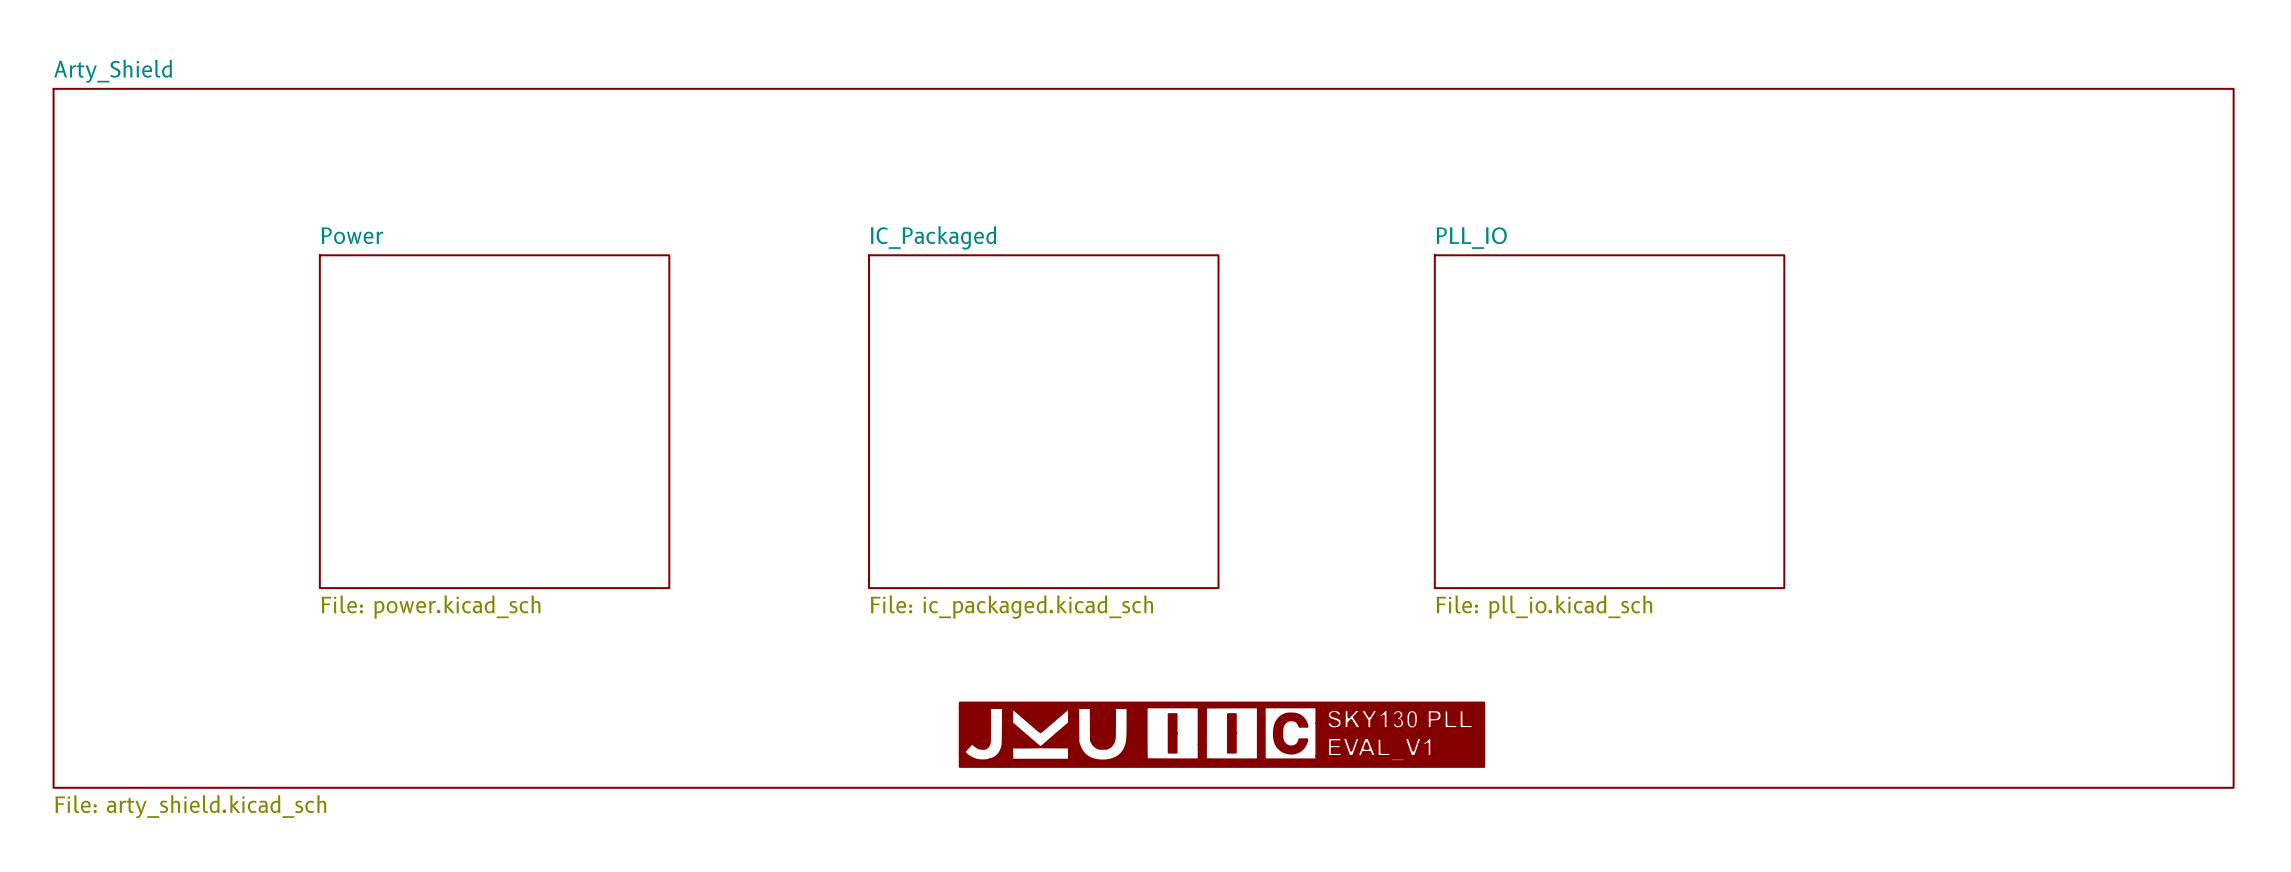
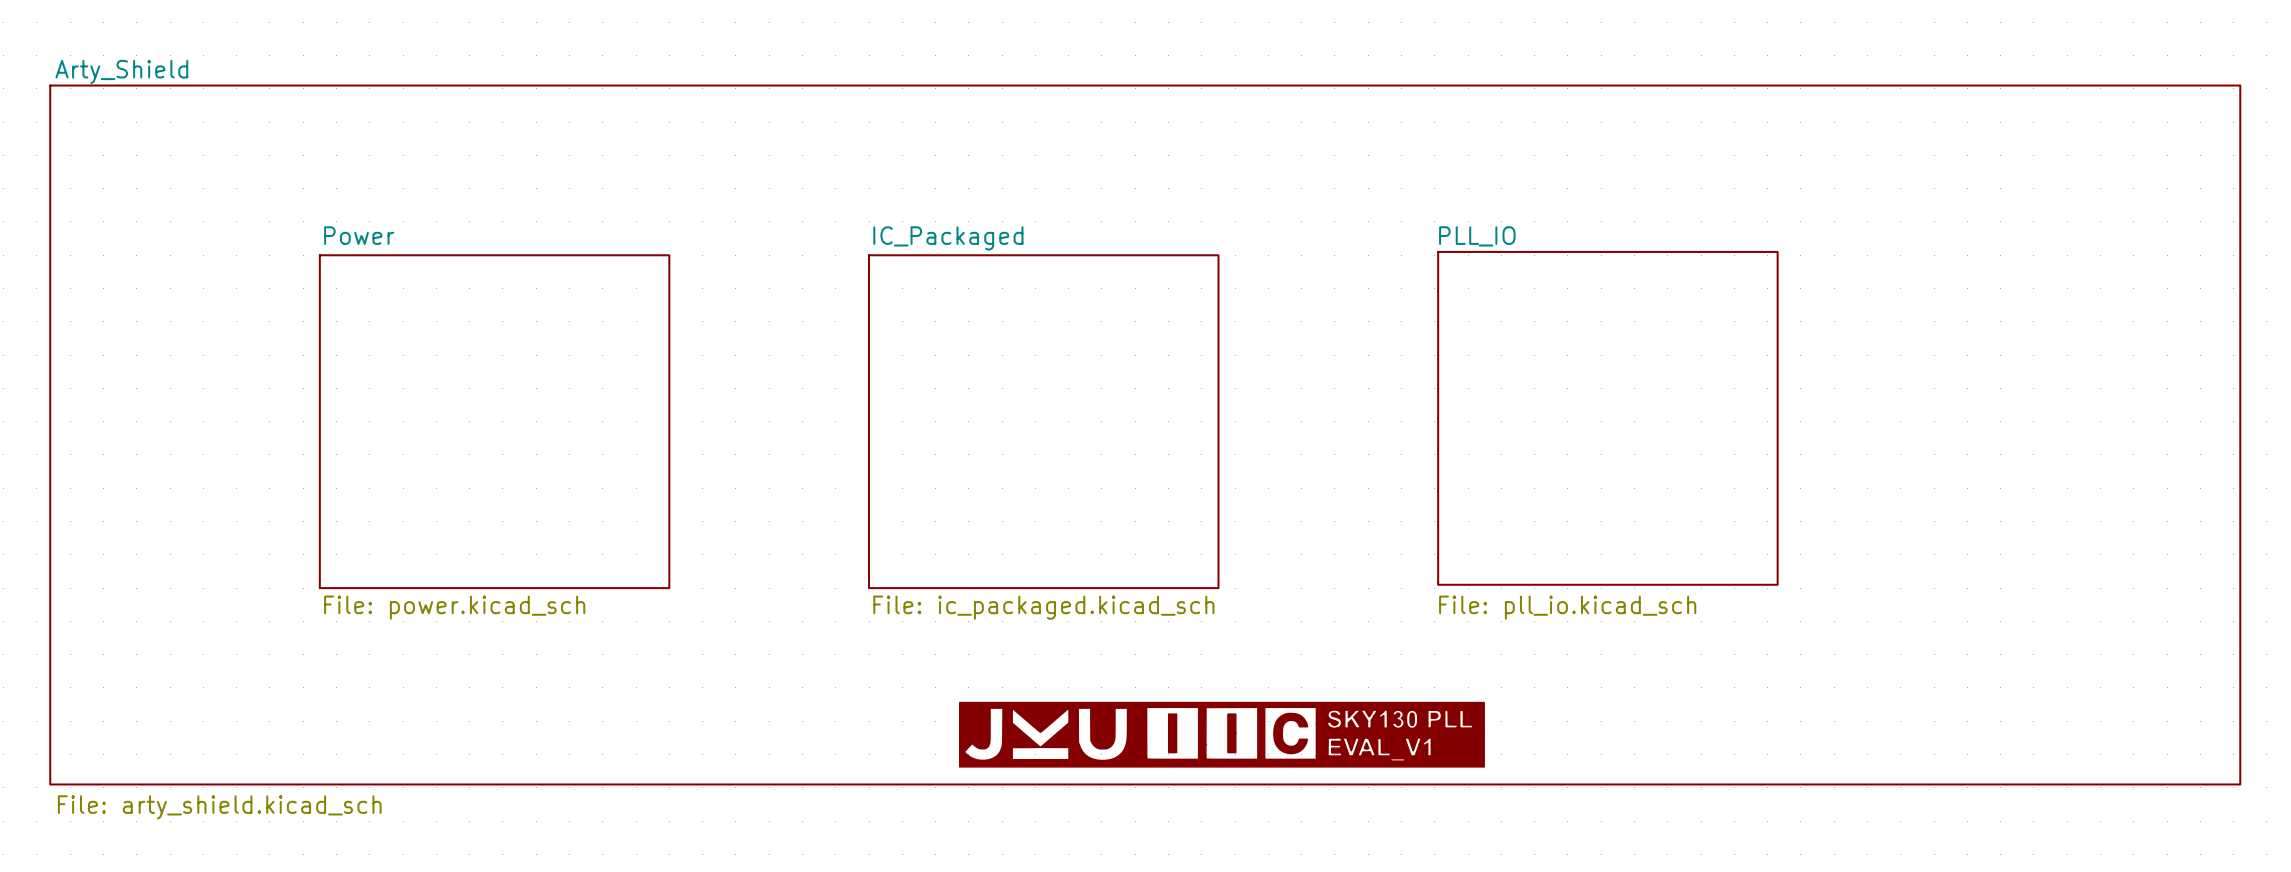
sheet Arty_Shield shape: [52, 87, 2235, 789] -> [49, 84, 2242, 786]
sheet PLL_IO shape: [1433, 254, 1786, 590] -> [1437, 250, 1779, 586]

